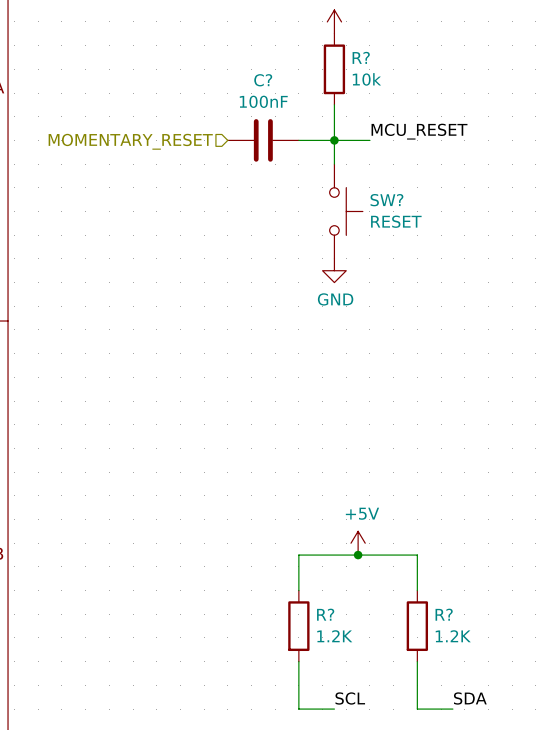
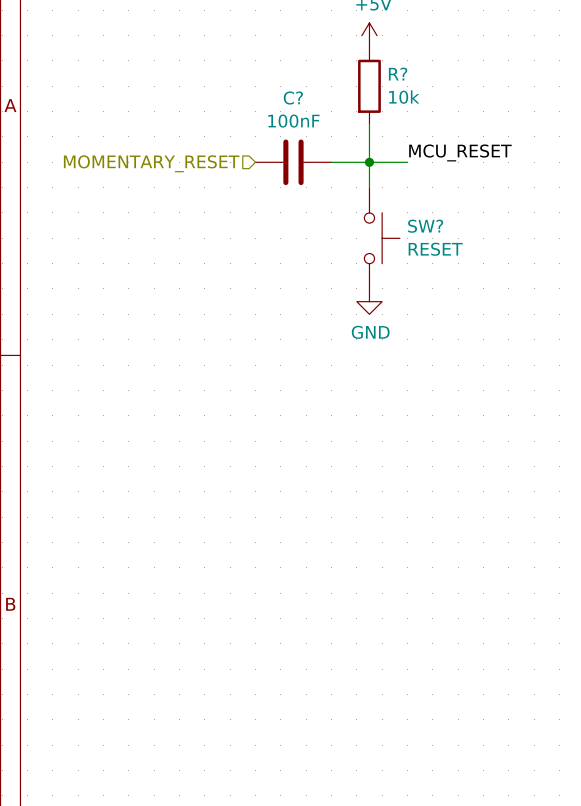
power symbol: +5V (358, 543) -> none
junction: (358, 555) -> none
wire: (298, 590) (298, 555) (417, 555) (417, 590) -> none
R?: 1.2K (298, 626) -> none
R?: 1.2K (417, 626) -> none
wire: (298, 661) (298, 709) (334, 709) -> none
wire: (417, 661) (417, 709) (452, 709) -> none
label: SCL (350, 698) -> none
label: SDA (470, 698) -> none

